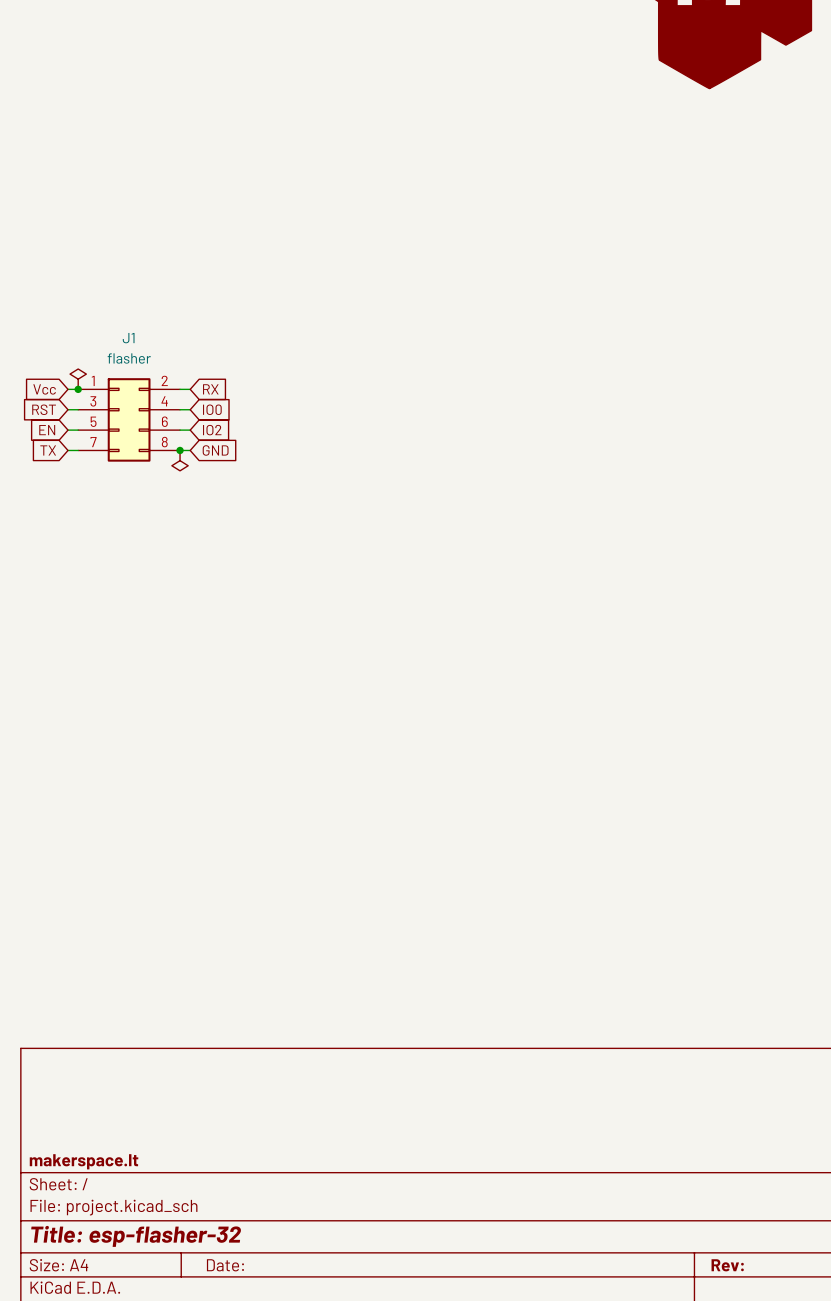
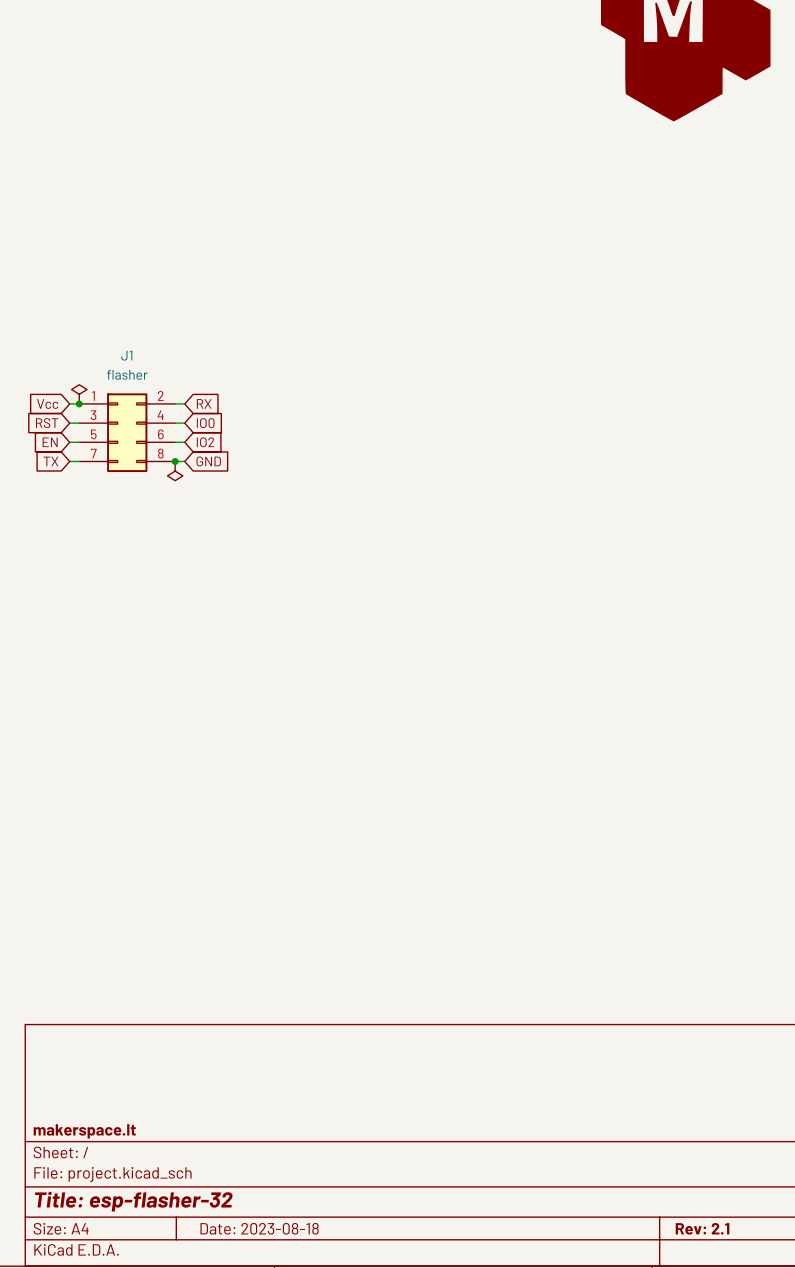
title block: Date: (225, 1265) -> Date: 2023-08-18 (259, 1228)
title block: Rev: (727, 1265) -> Rev: 2.1 (702, 1228)

